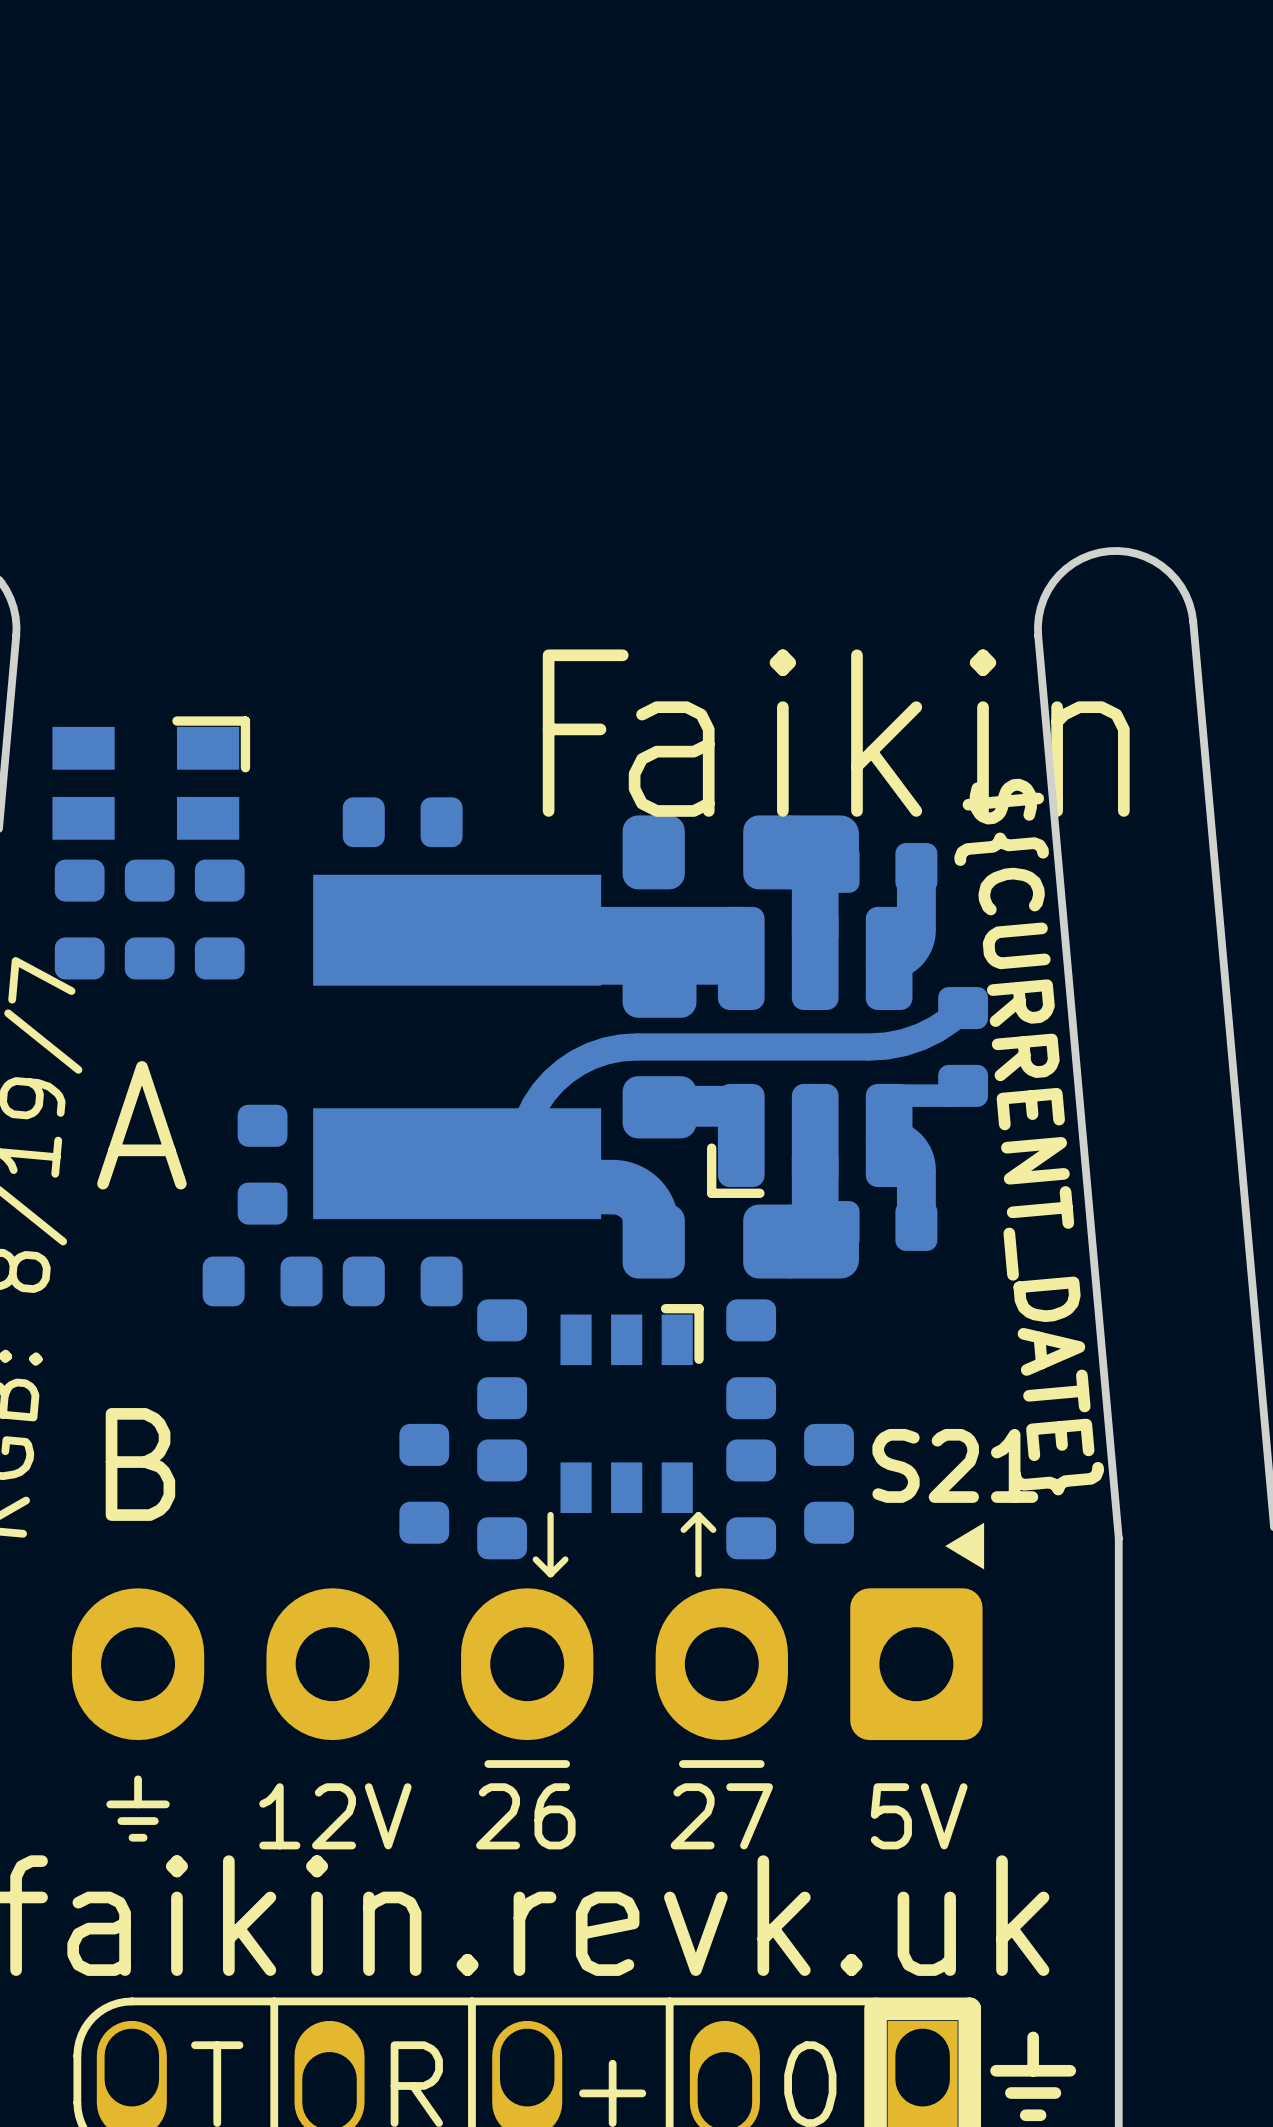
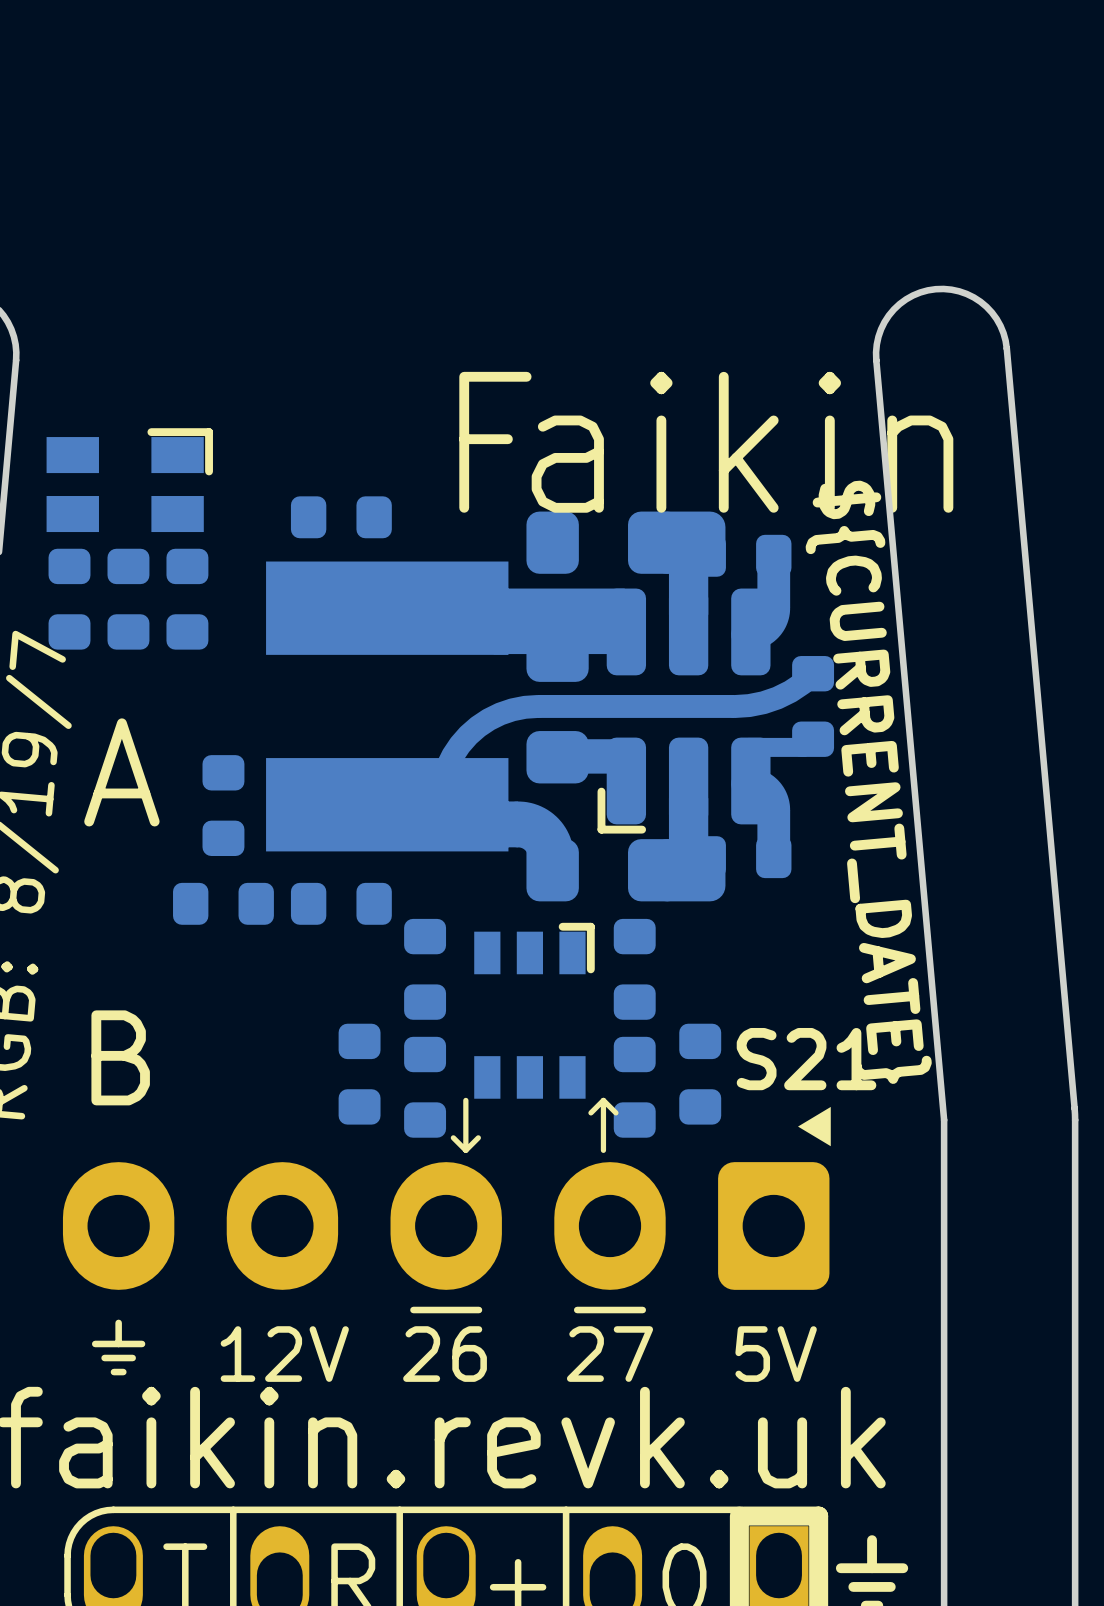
text position: ↑ (698, 1544) -> ↑ (603, 1125)

